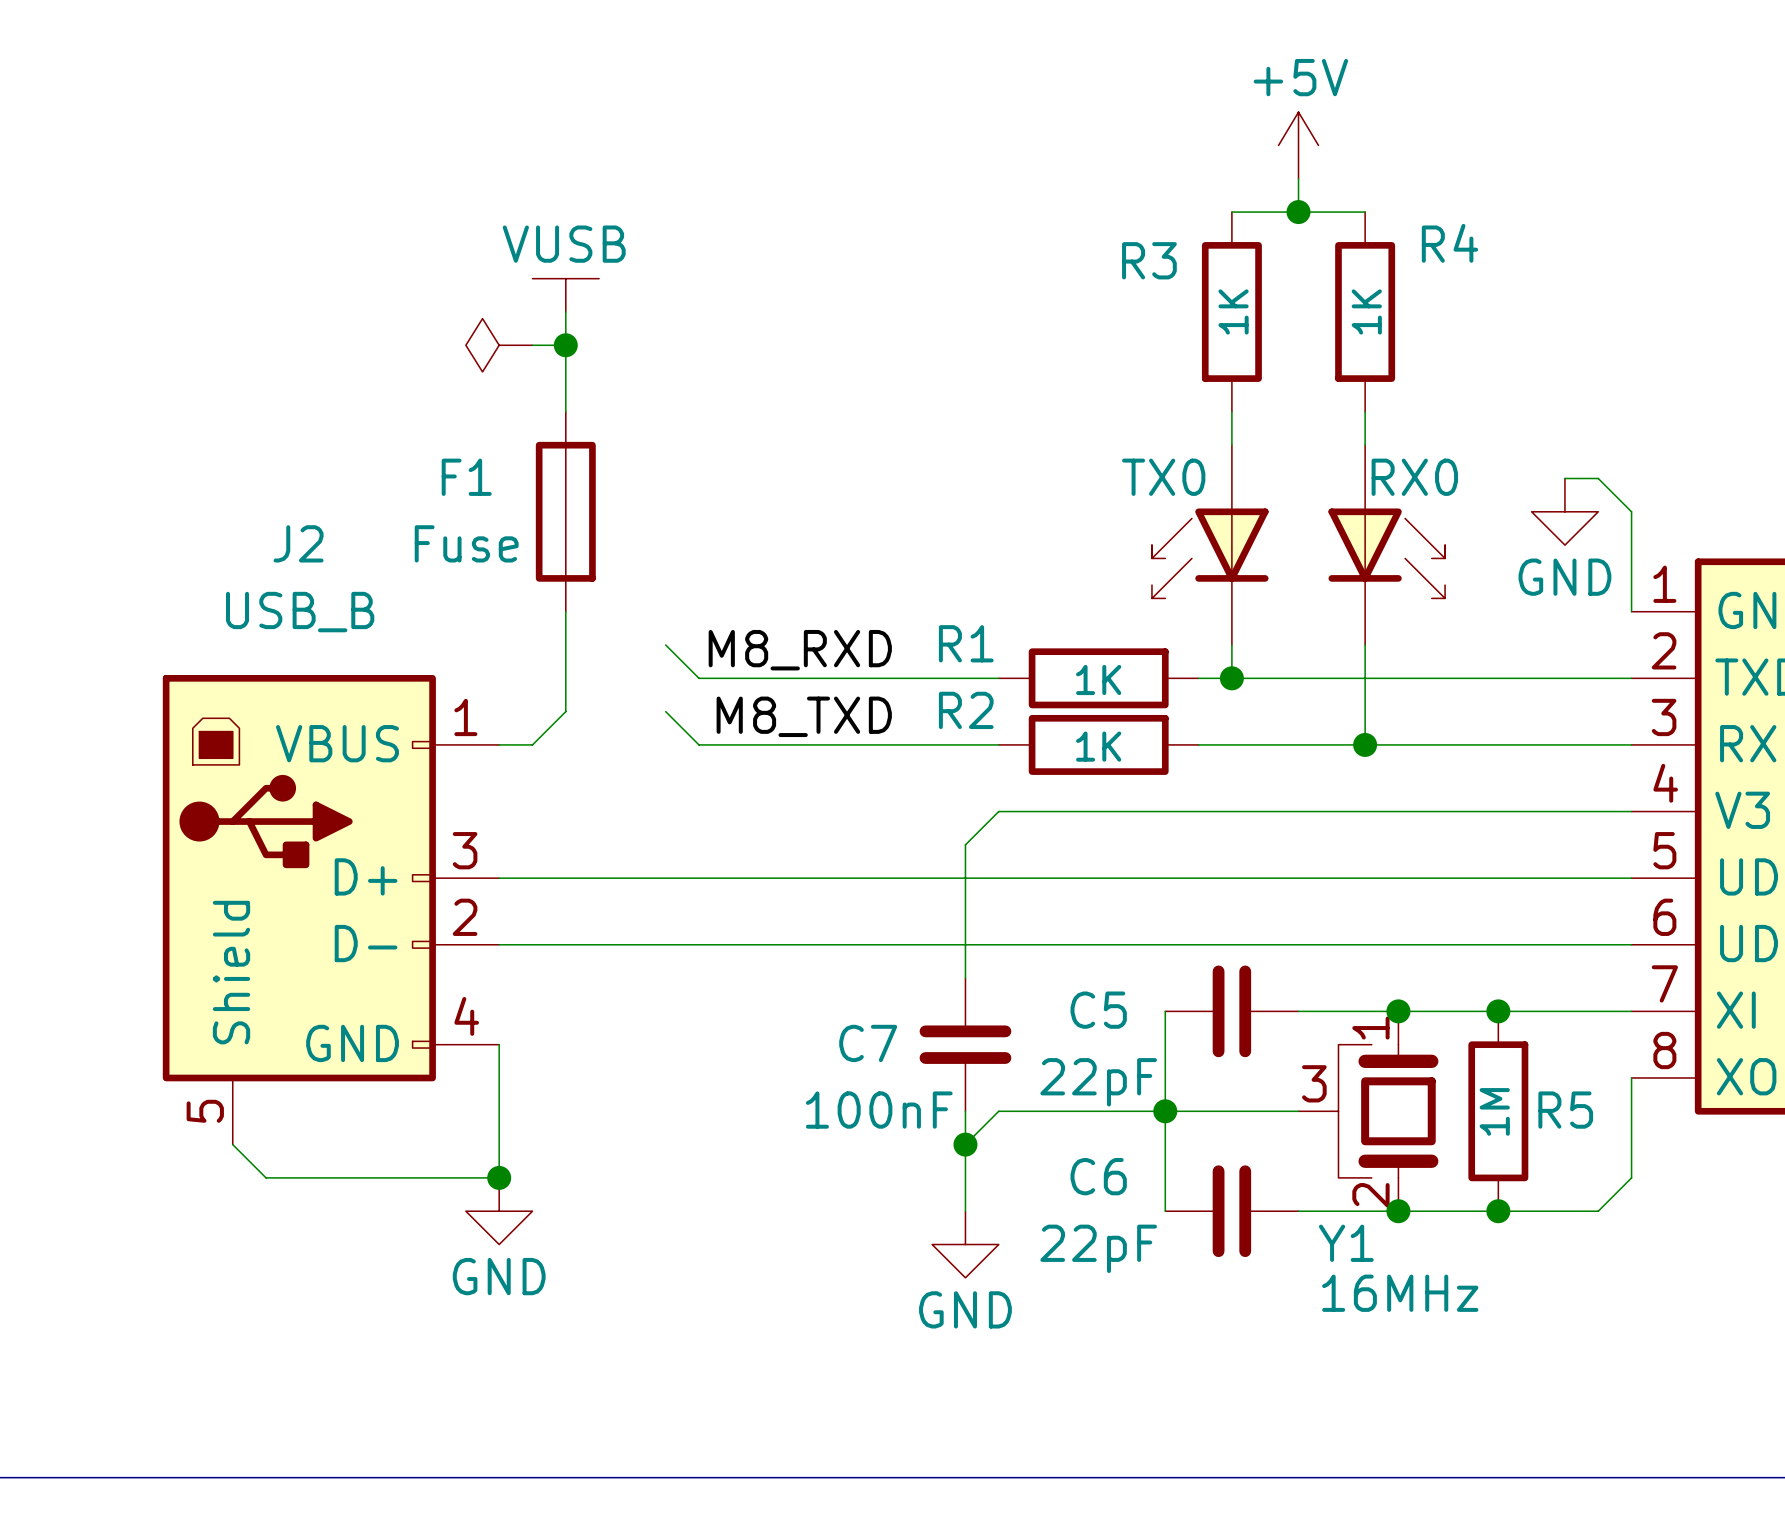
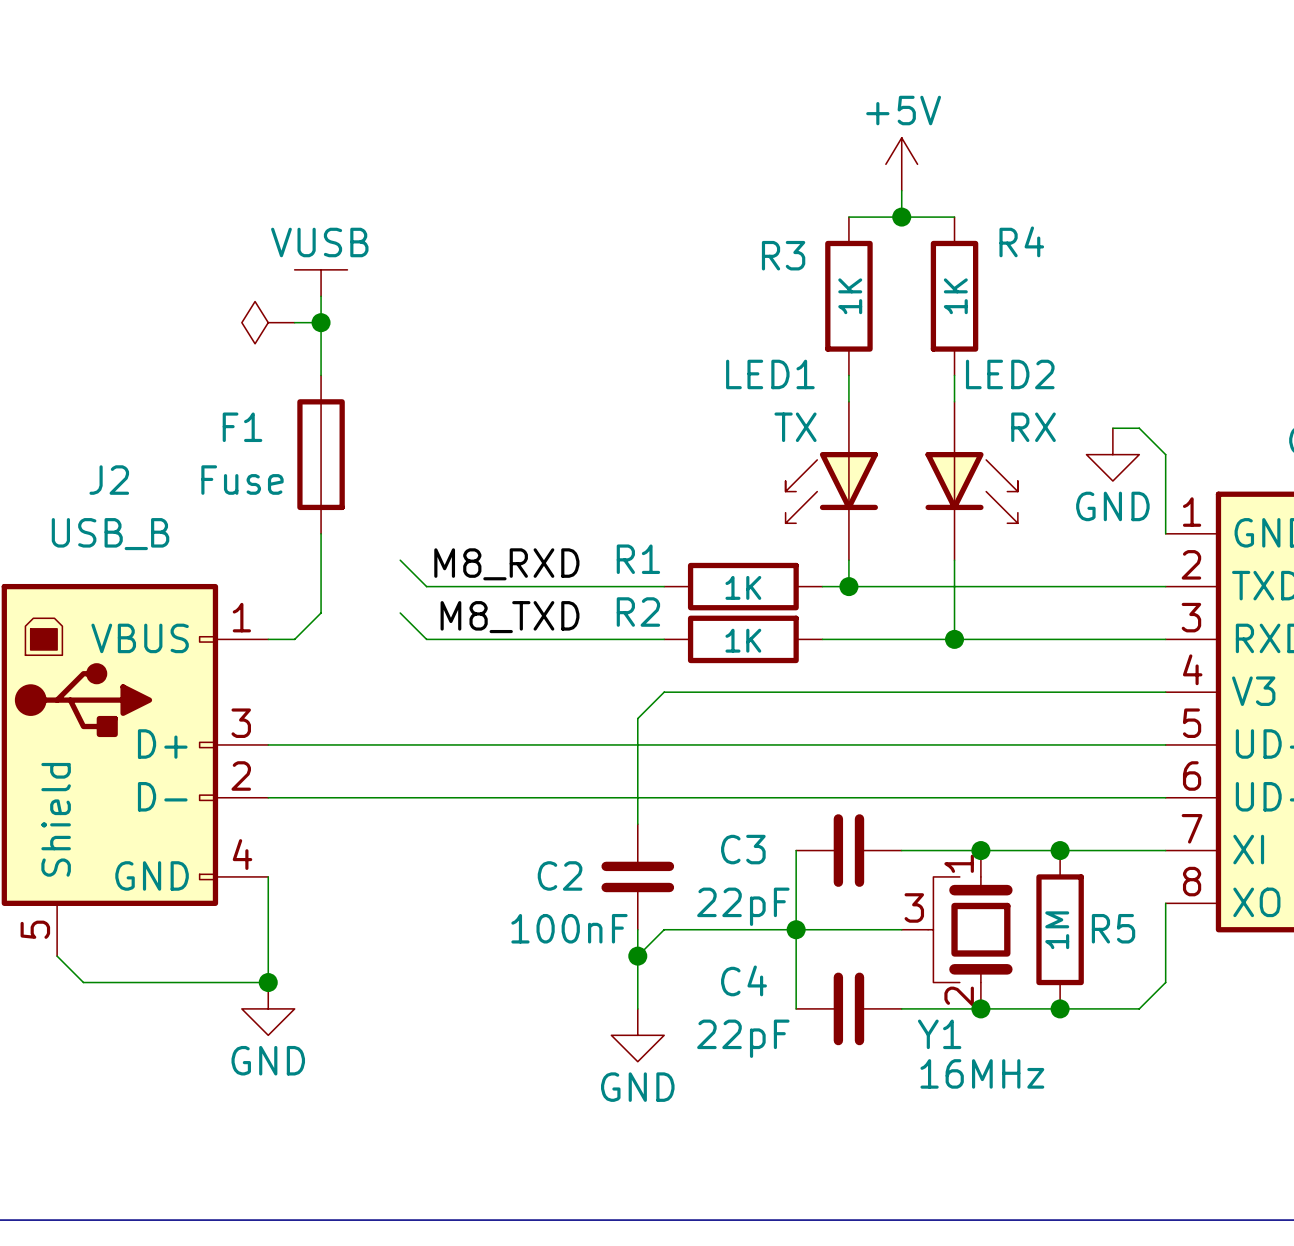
TX0 name: TX0 (1163, 477) -> LED1 (770, 374)
TX0 value: none -> TX (795, 427)
RX0 name: RX0 (1414, 477) -> LED2 (1010, 374)
RX0 value: none -> RX (1033, 427)
C5 name: C5 (1098, 1010) -> C3 (743, 849)
C7 name: C7 (868, 1043) -> C2 (560, 875)
C6 name: C6 (1098, 1176) -> C4 (743, 980)

